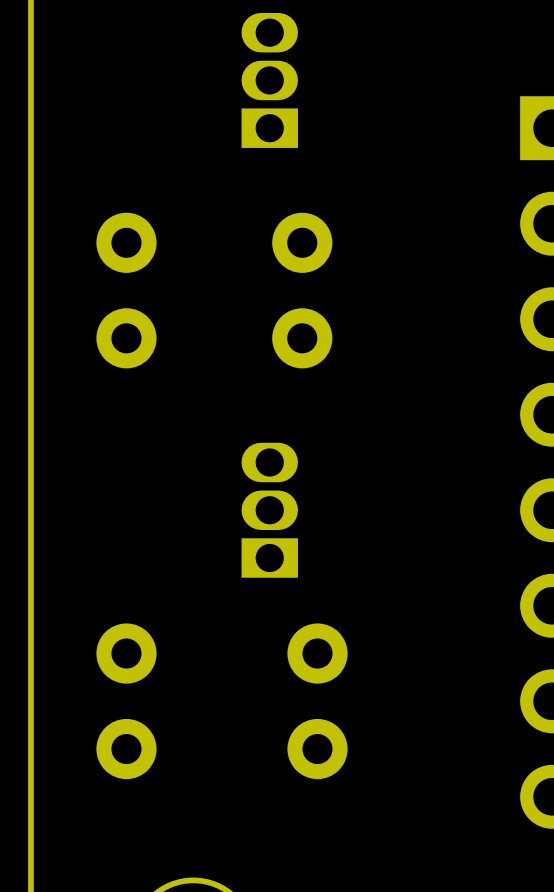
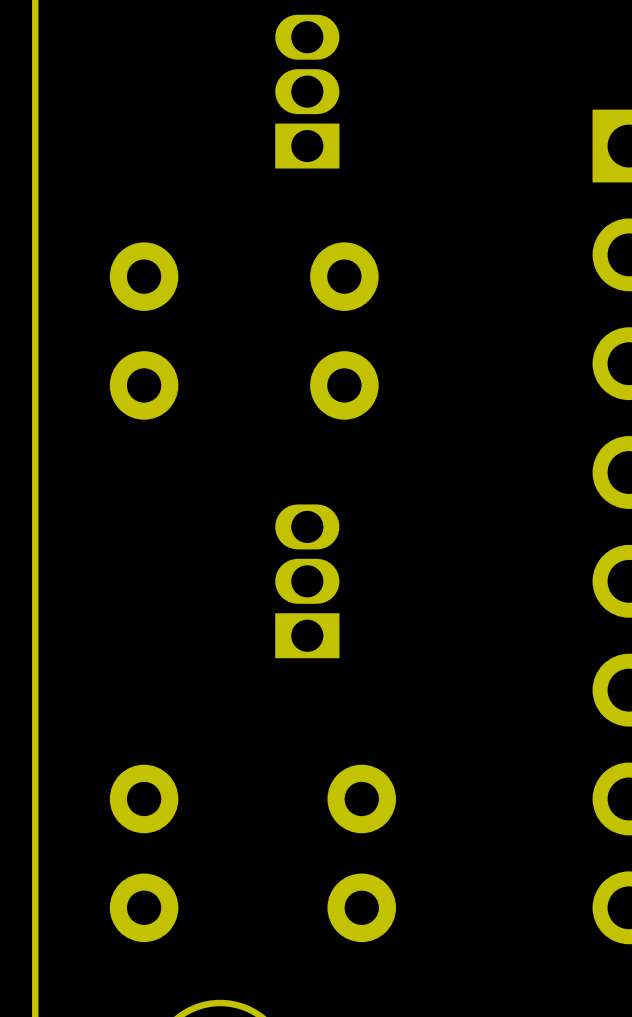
part position: (126, 701) -> (144, 853)
part position: (317, 701) -> (361, 853)

